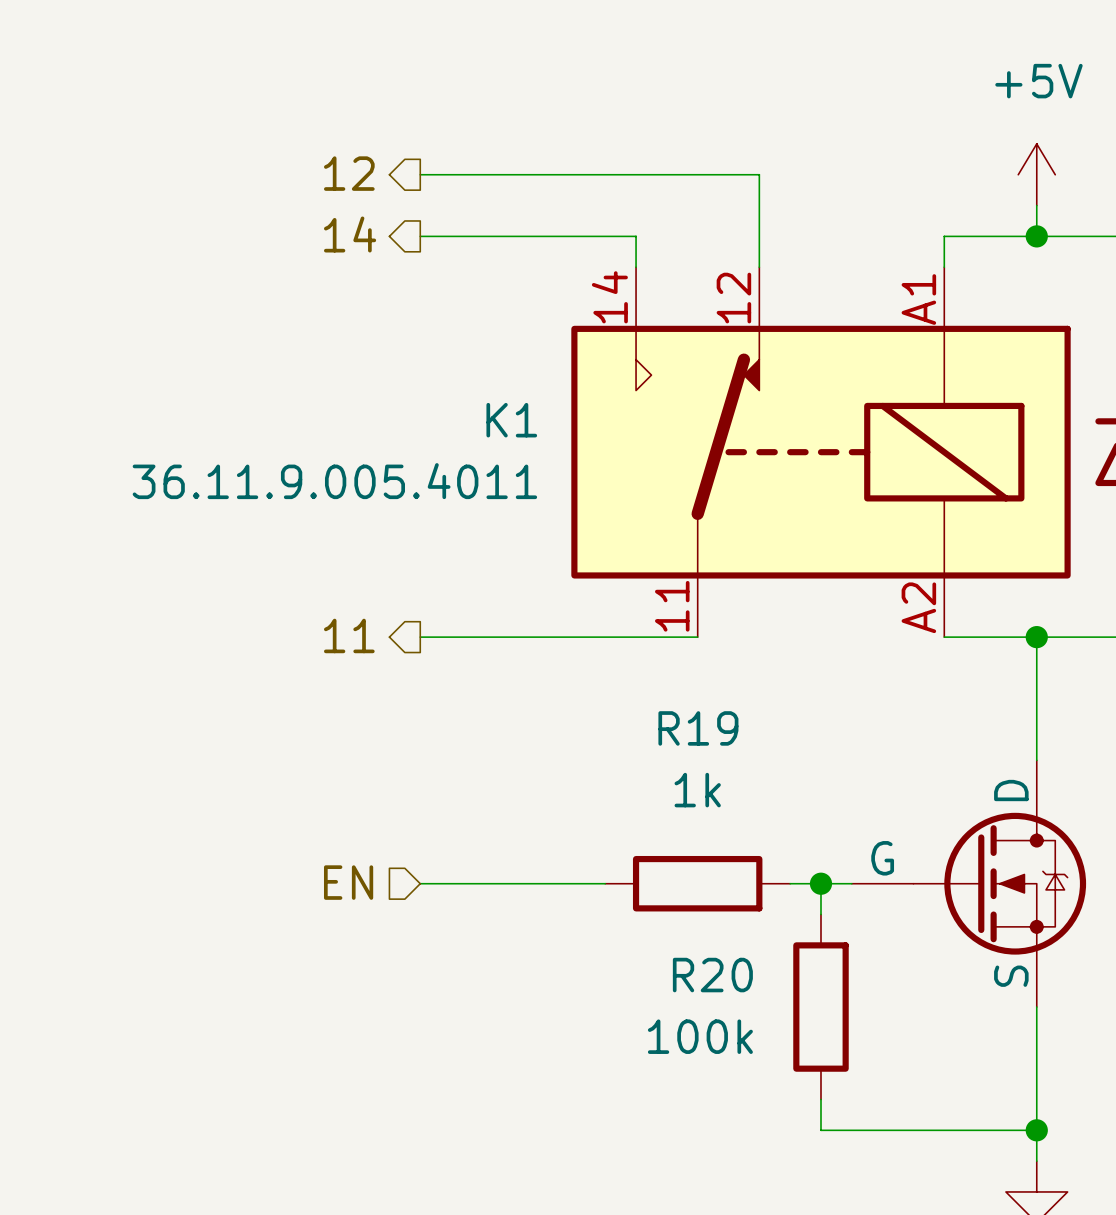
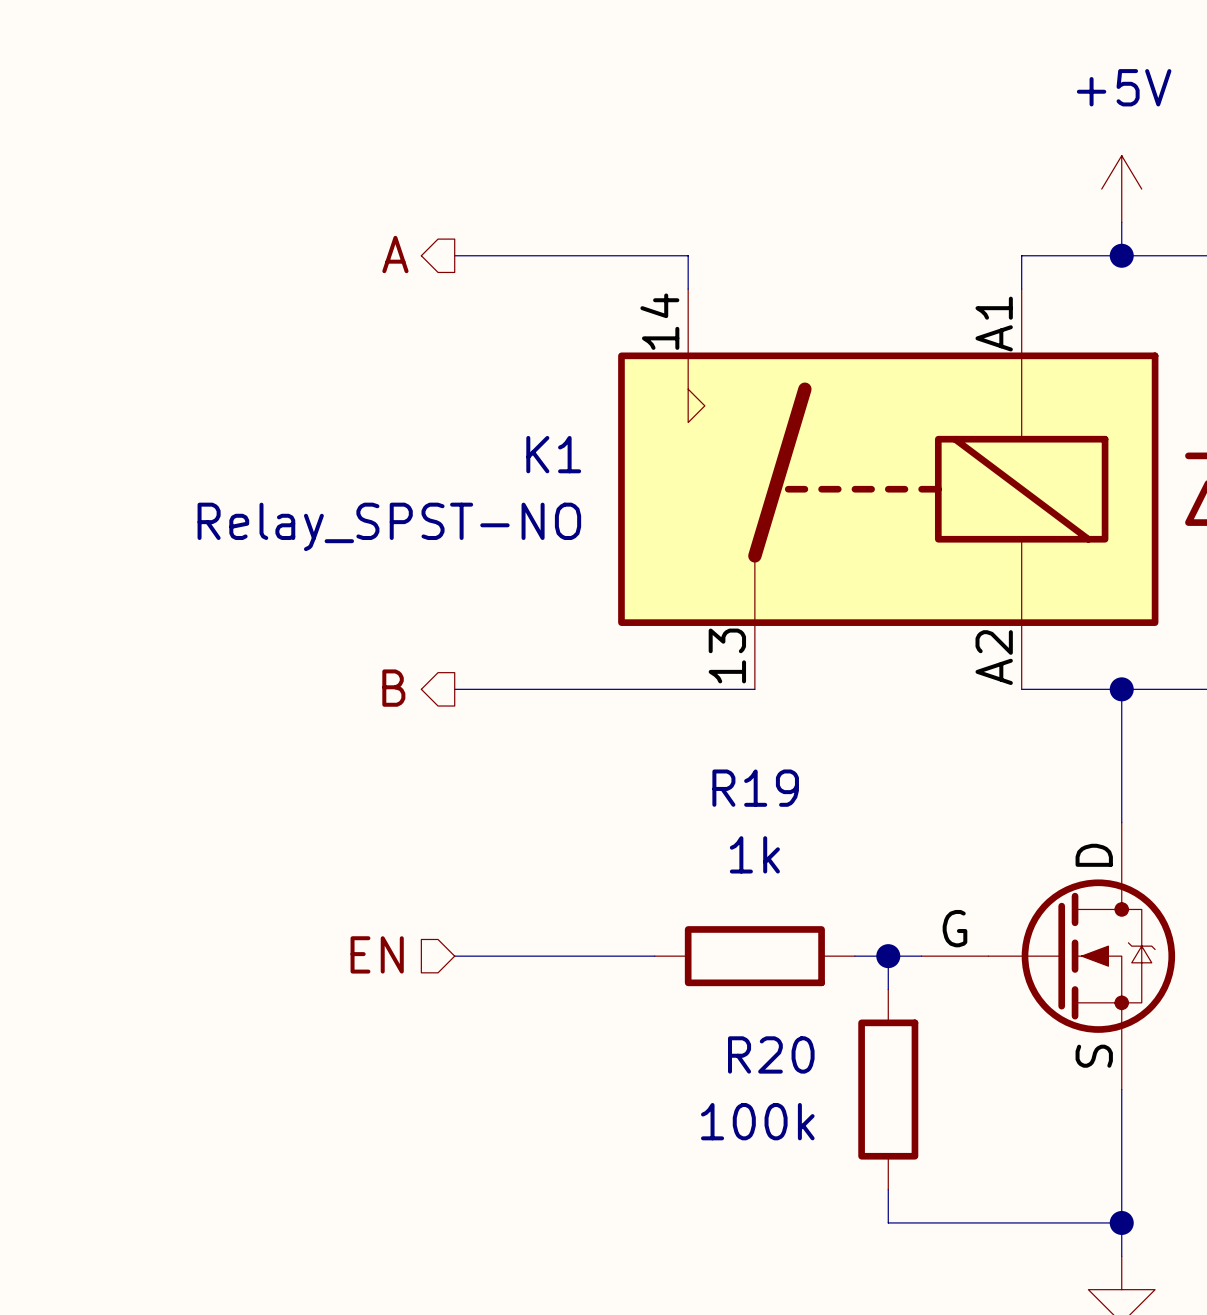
hierarchical label: 12 (349, 173) -> none
wire: (420, 174) (759, 174) (759, 267) -> none
hierarchical label: 14 (350, 234) -> A (395, 254)
K1 symbol: [571, 267, 1071, 638] -> [618, 289, 1159, 690]
K1 value: 36.11.9.005.4011 (334, 481) -> Relay_SPST-NO (389, 526)
hierarchical label: 11 (349, 635) -> B (393, 688)

